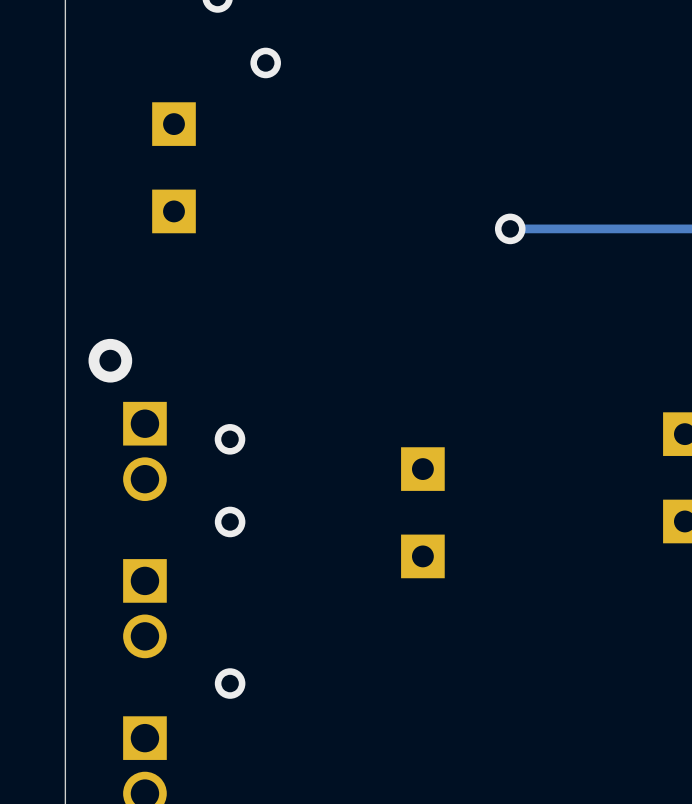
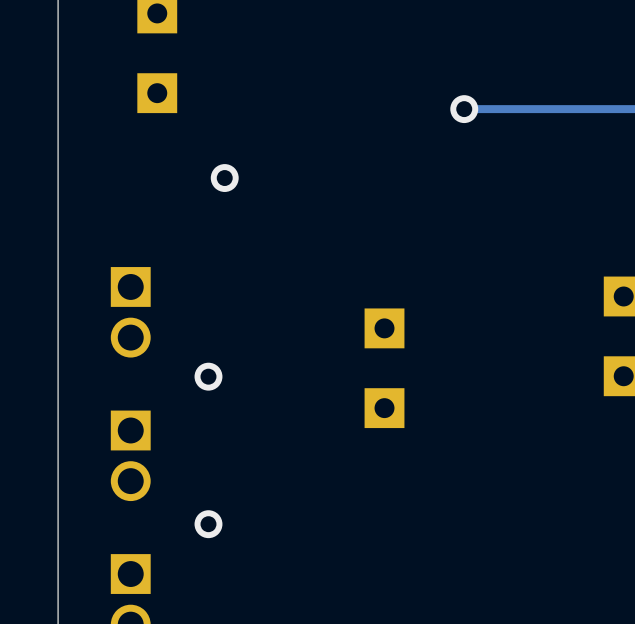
via: (110, 360) -> none
via position: (230, 439) -> (224, 178)

